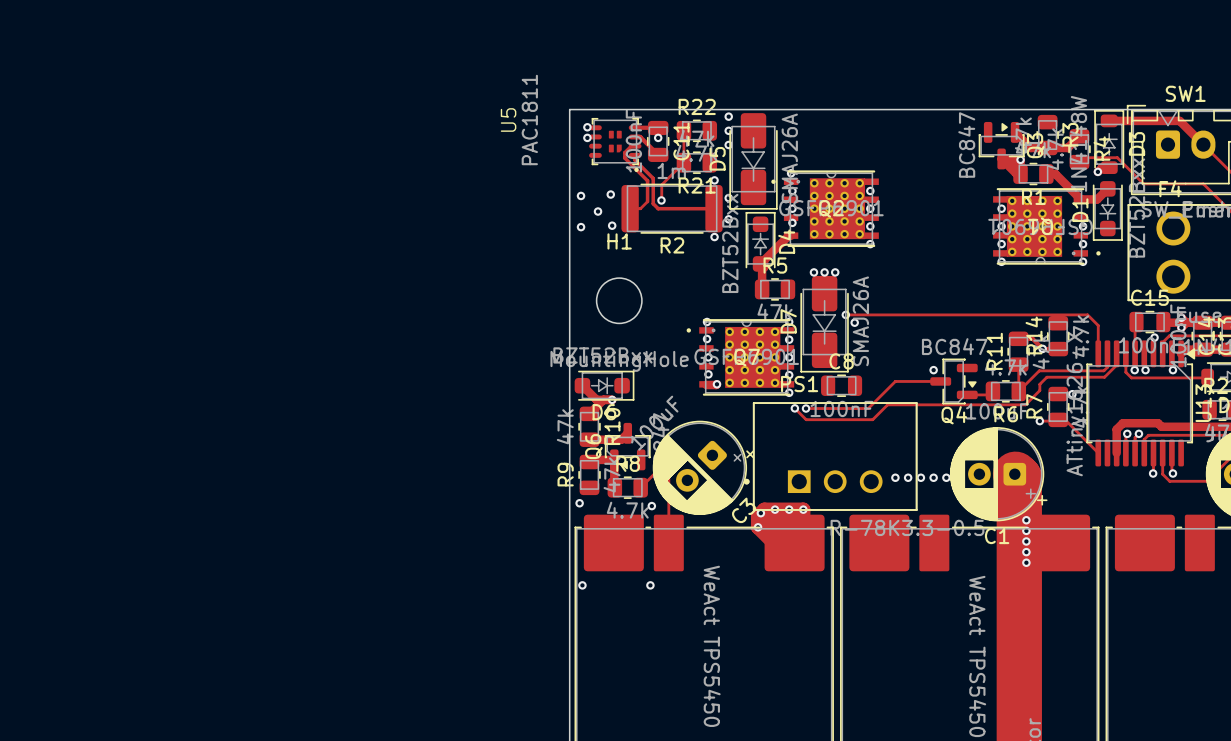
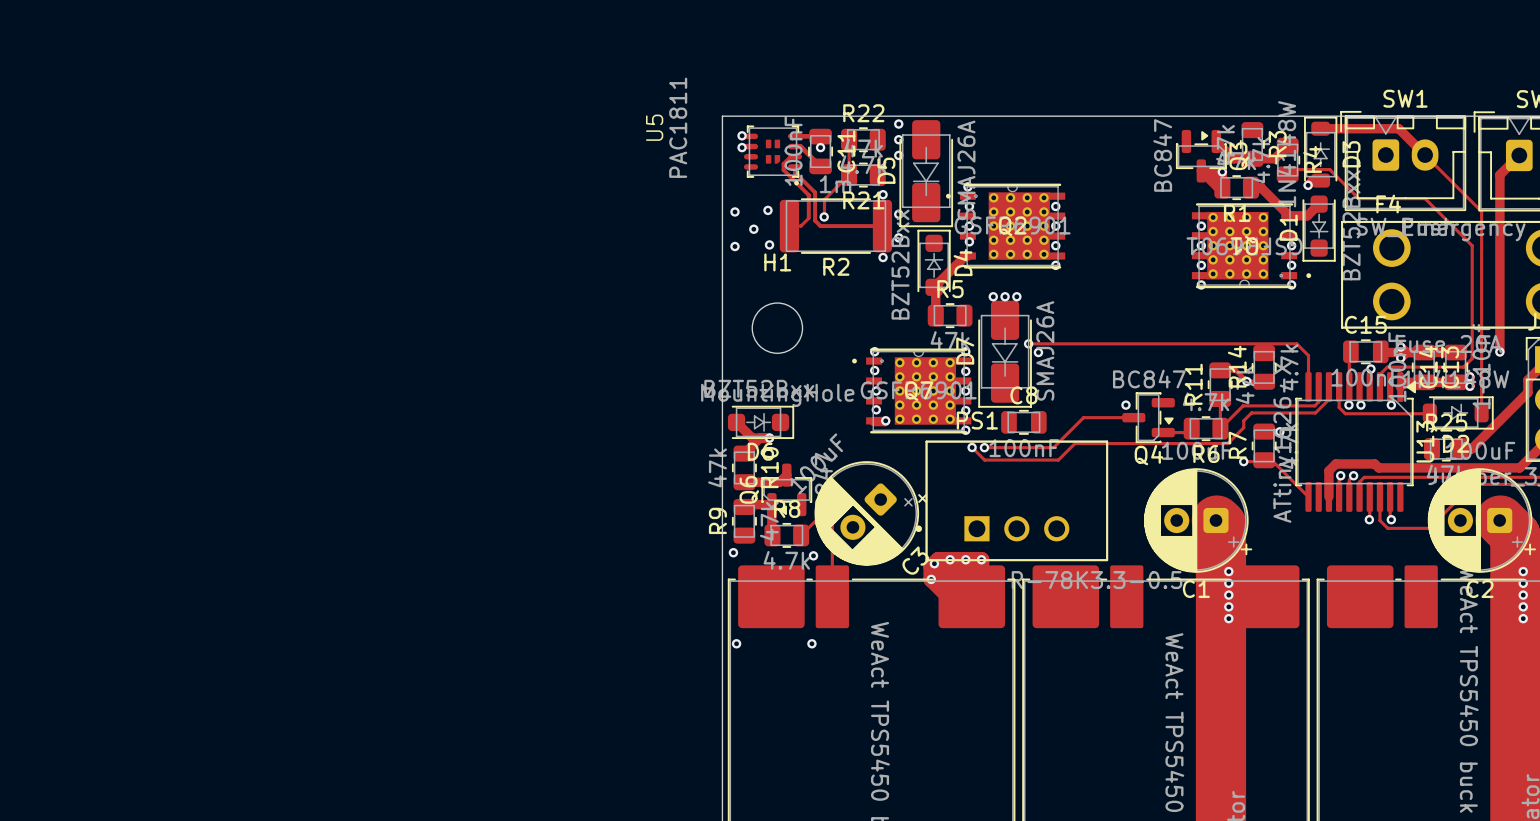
via: (895, 477) -> none
via: (908, 477) -> none
via: (920, 477) -> none
via: (933, 477) -> none
via: (946, 477) -> none

